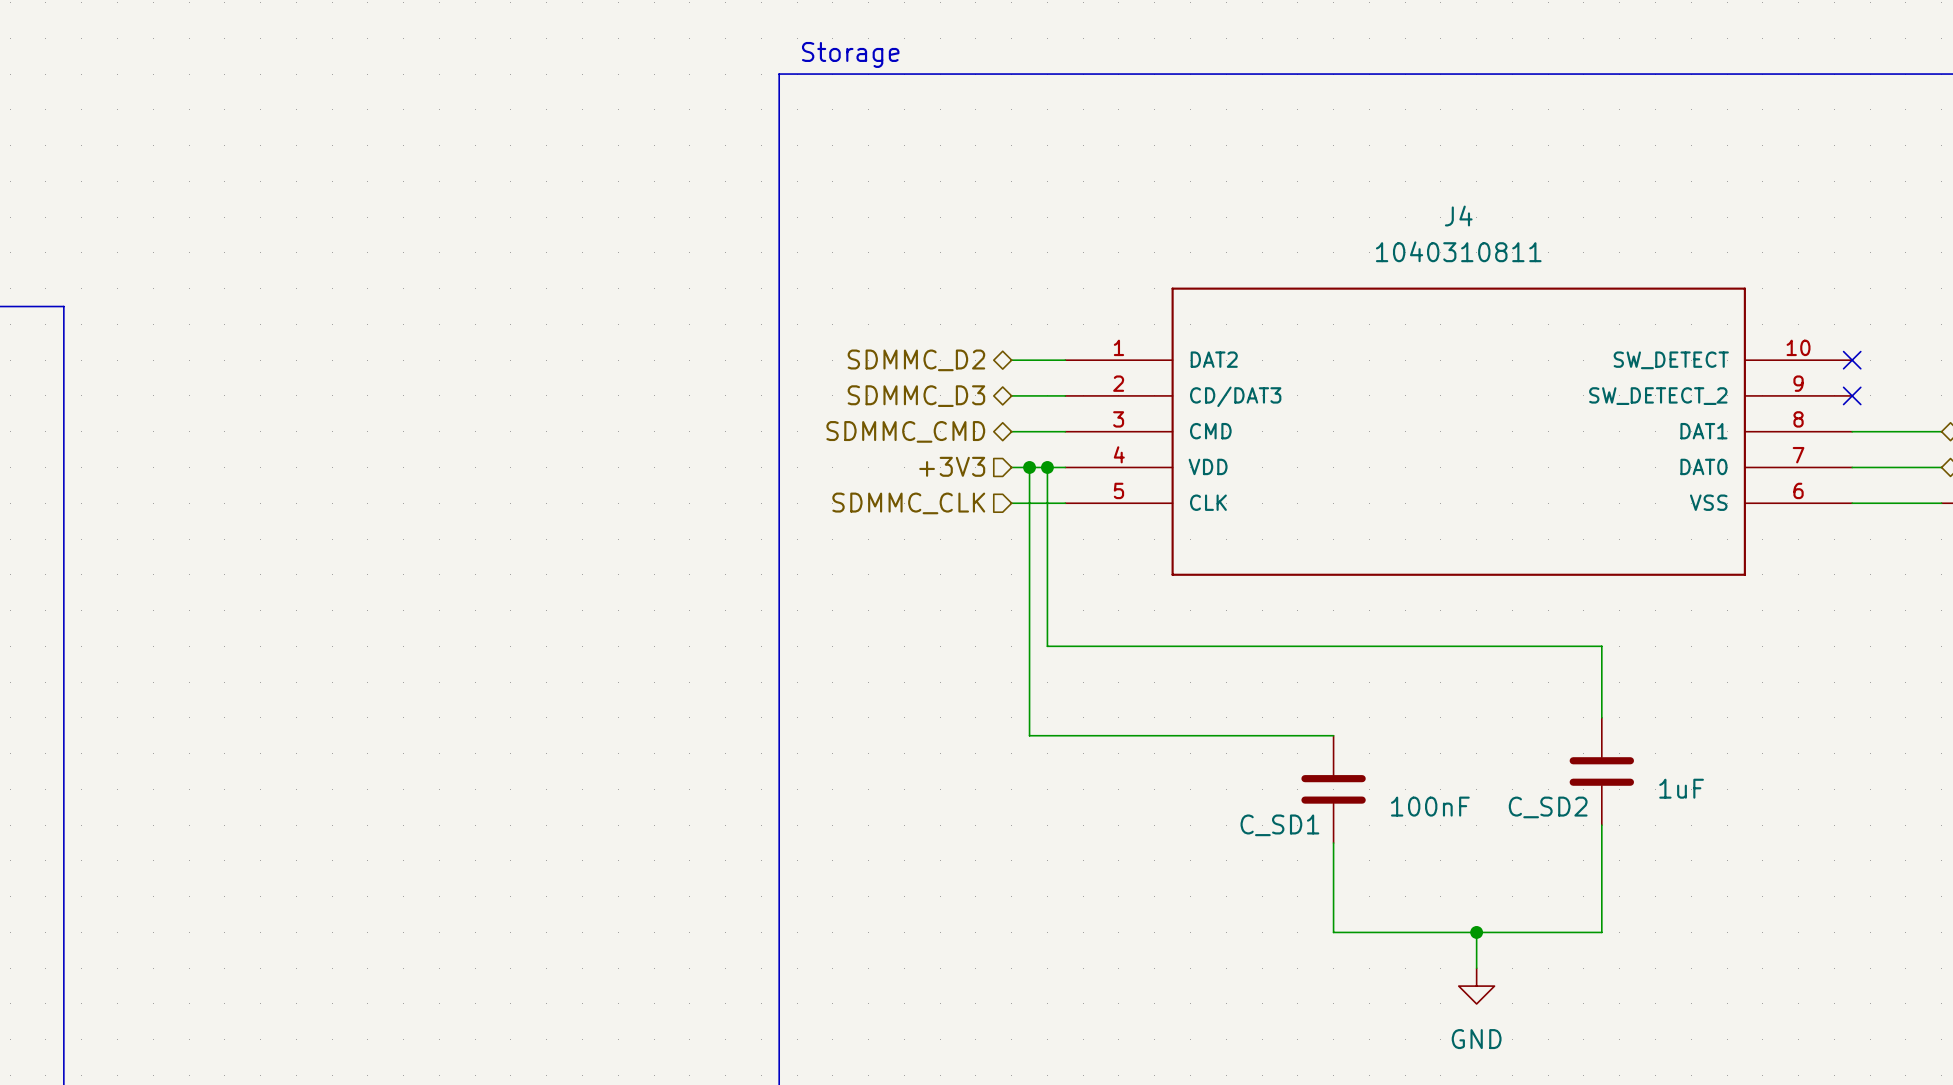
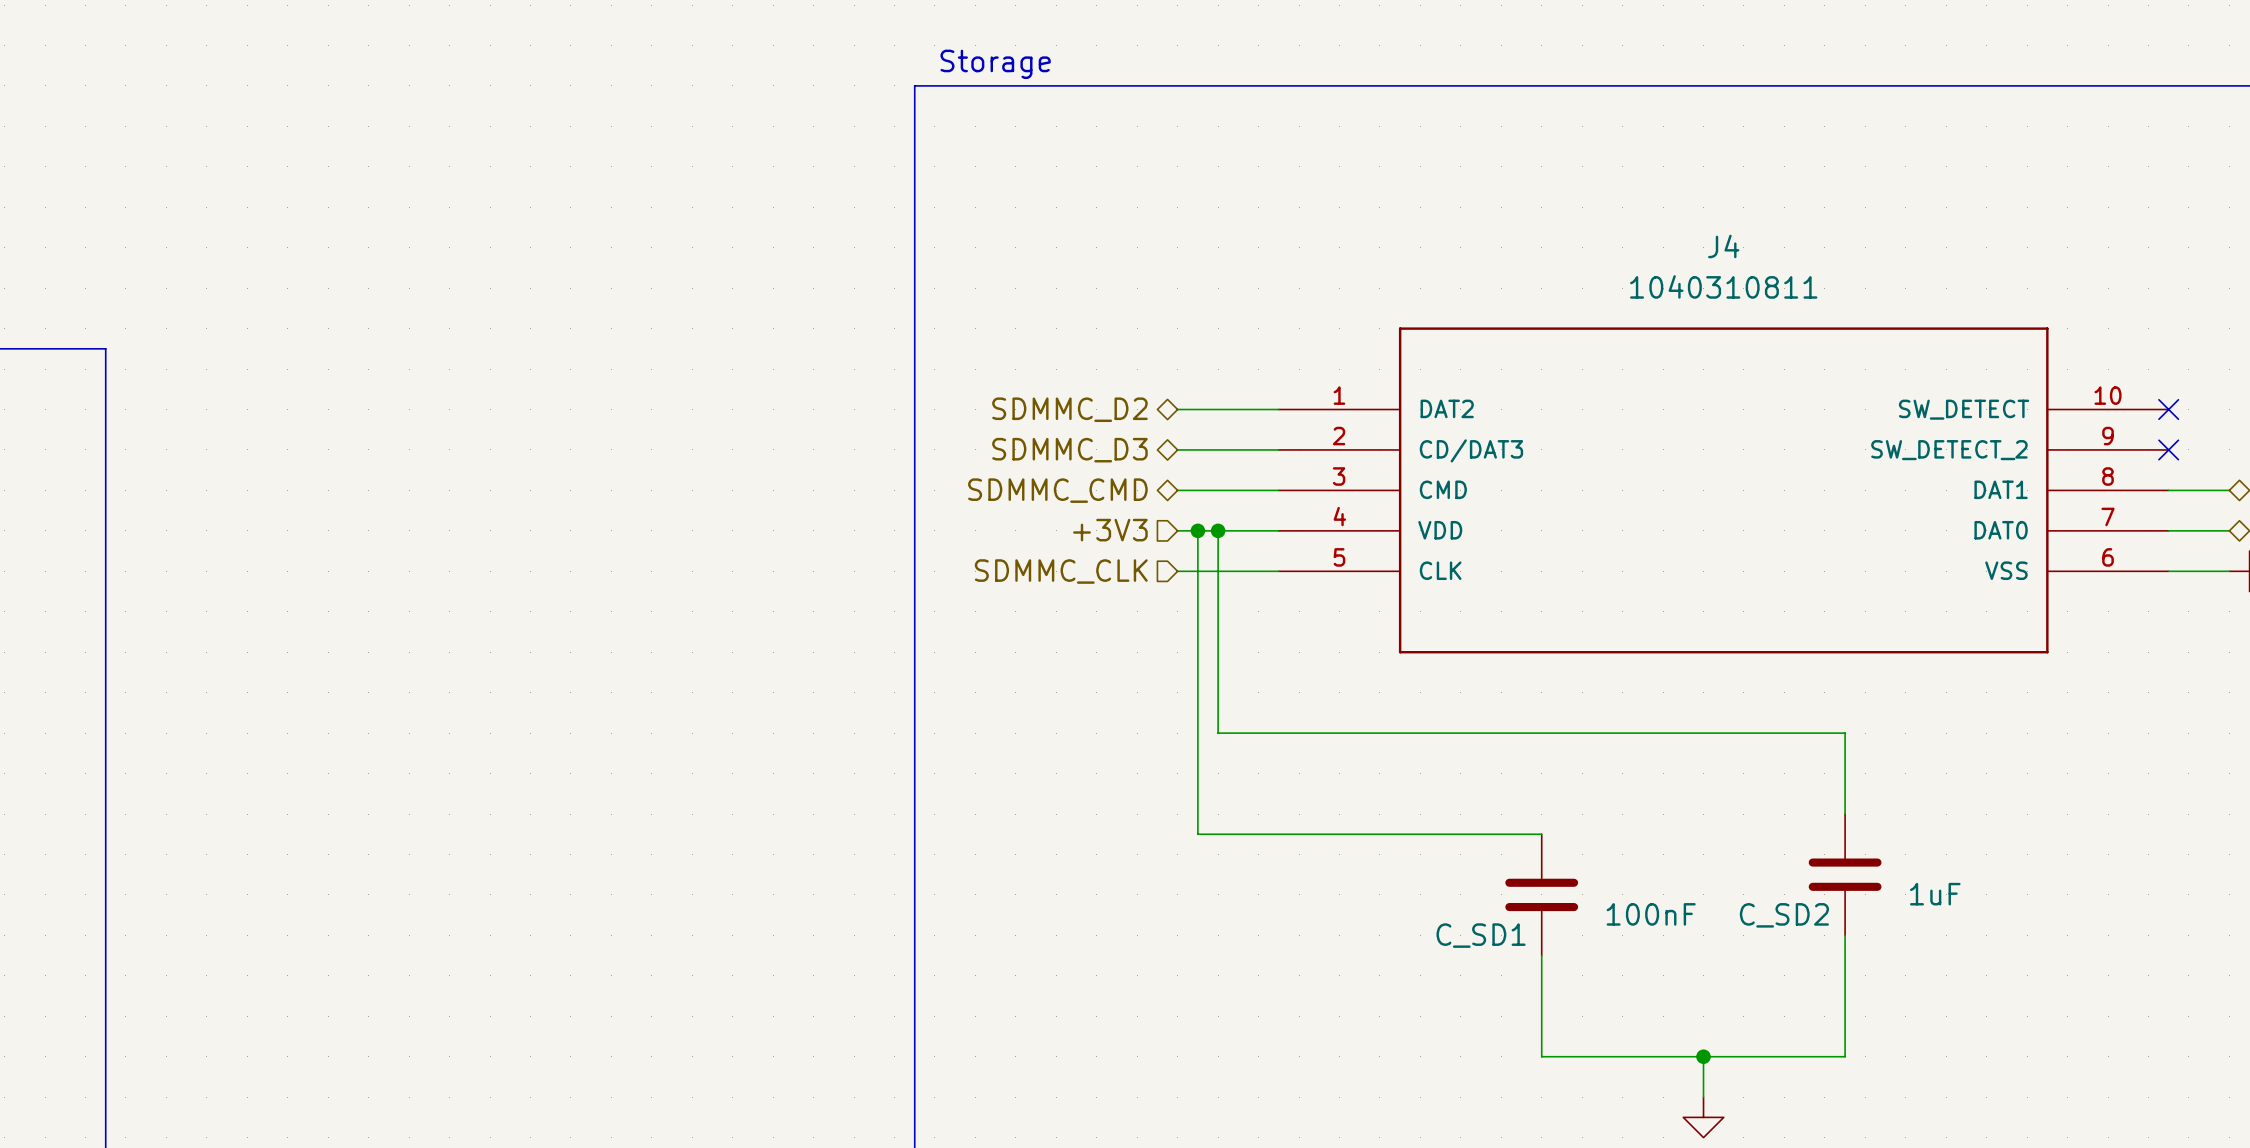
no-connect mark: (1852, 360) -> none
no-connect mark: none -> (2168, 409)
no-connect mark: (1852, 395) -> none
no-connect mark: none -> (2168, 449)
J4 position: (1458, 431) -> (1723, 490)

